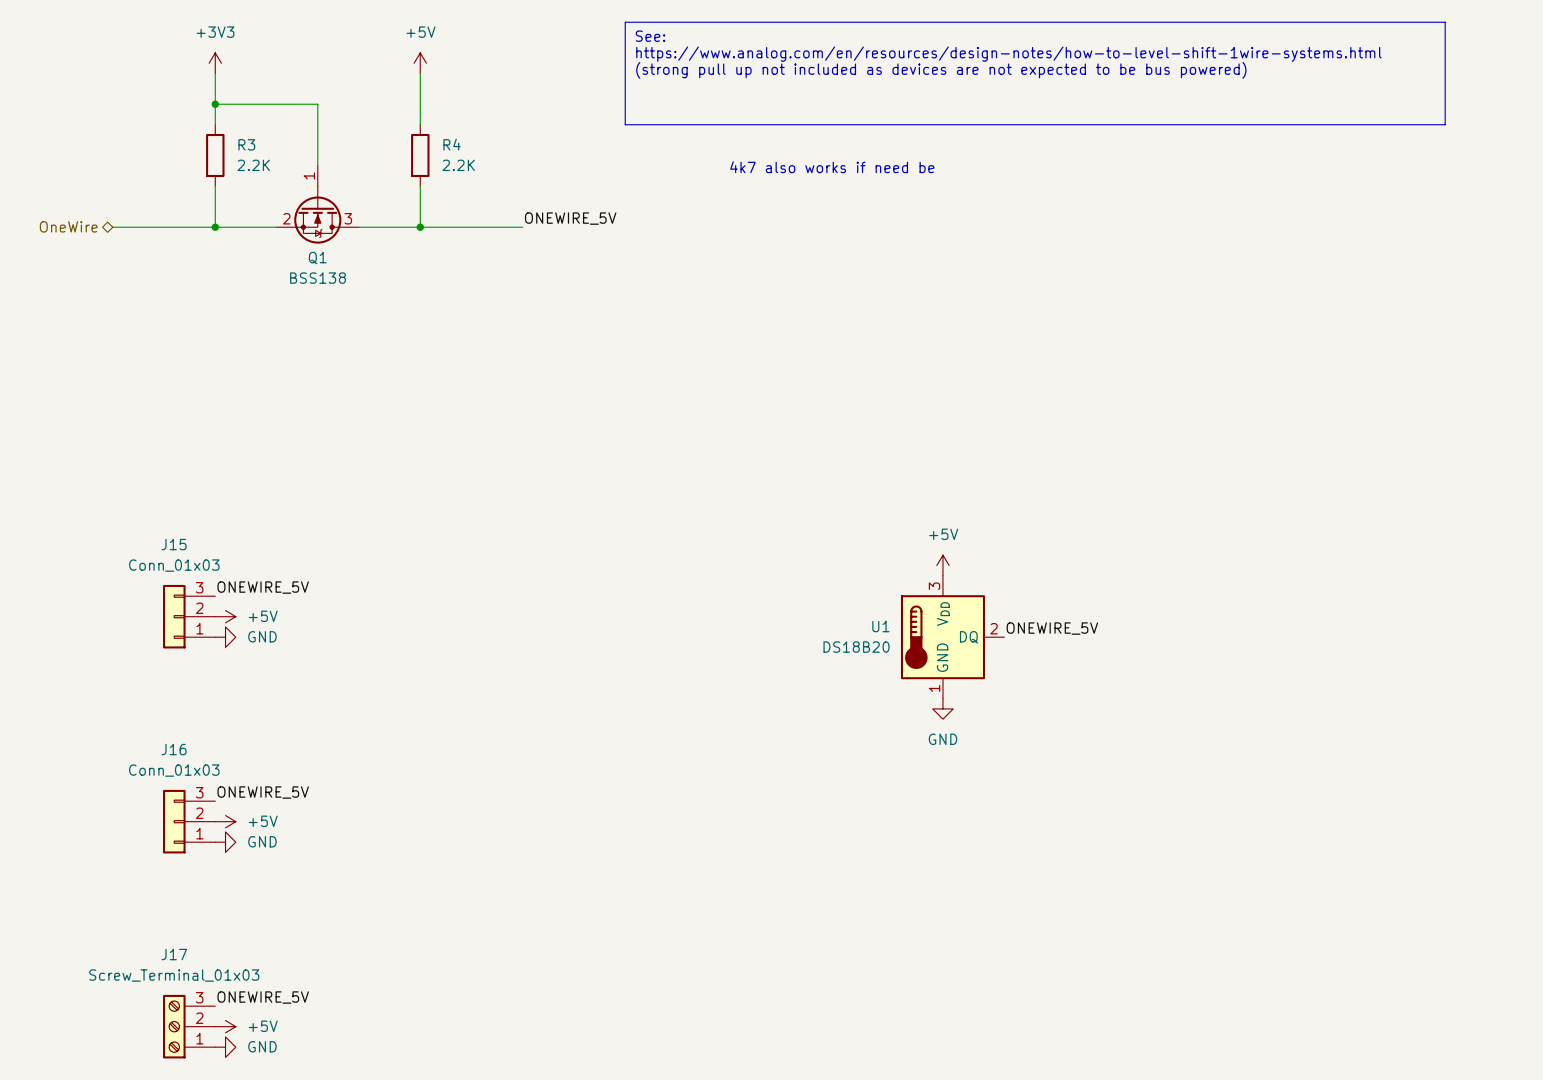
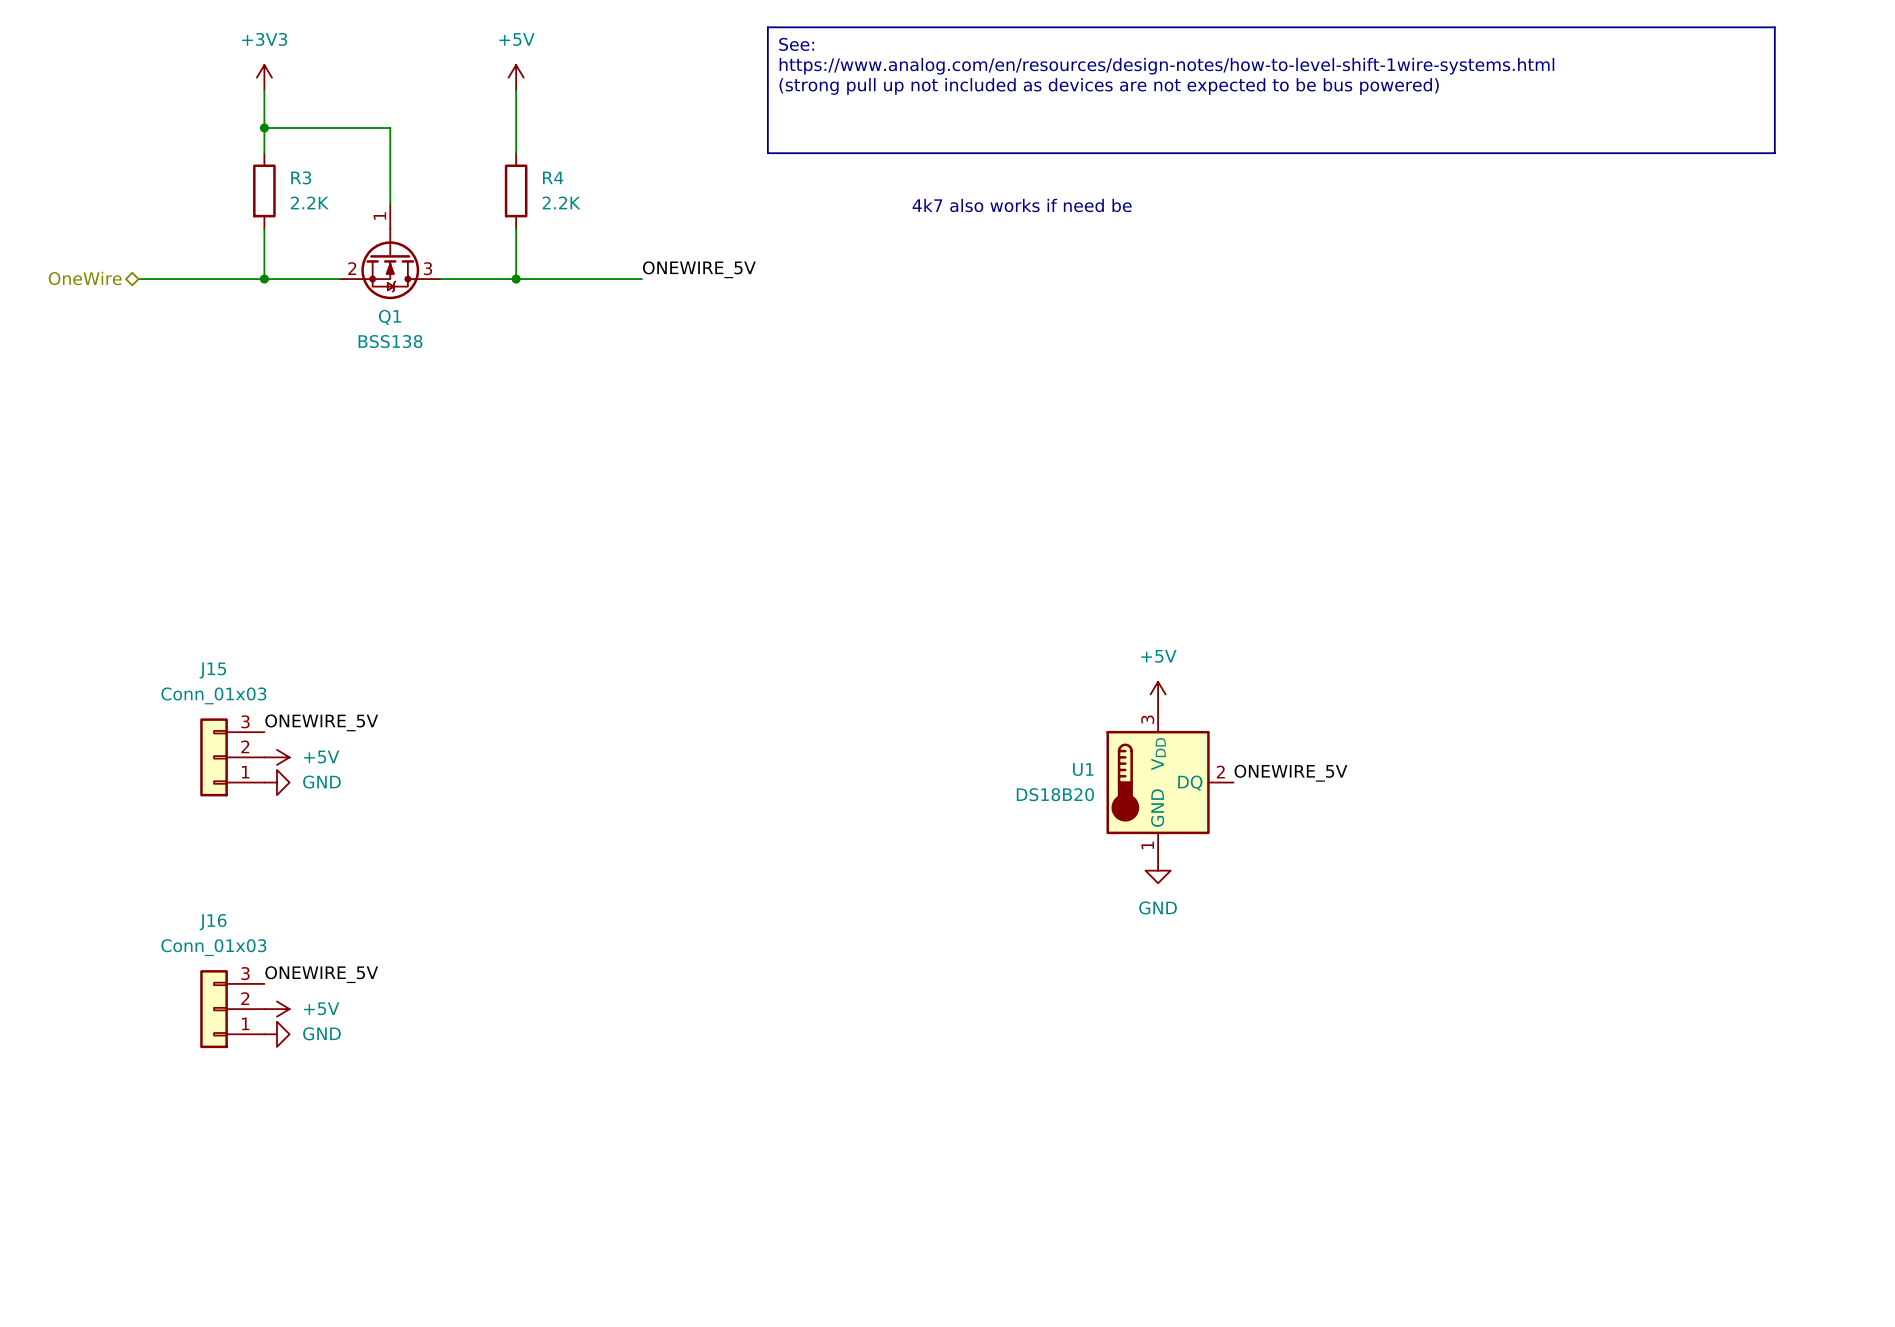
label: ONEWIRE_5V (263, 997) -> none
J17: Screw_Terminal_01x03 (189, 1026) -> none
power symbol: +5V (225, 1026) -> none
power symbol: GND (225, 1047) -> none

